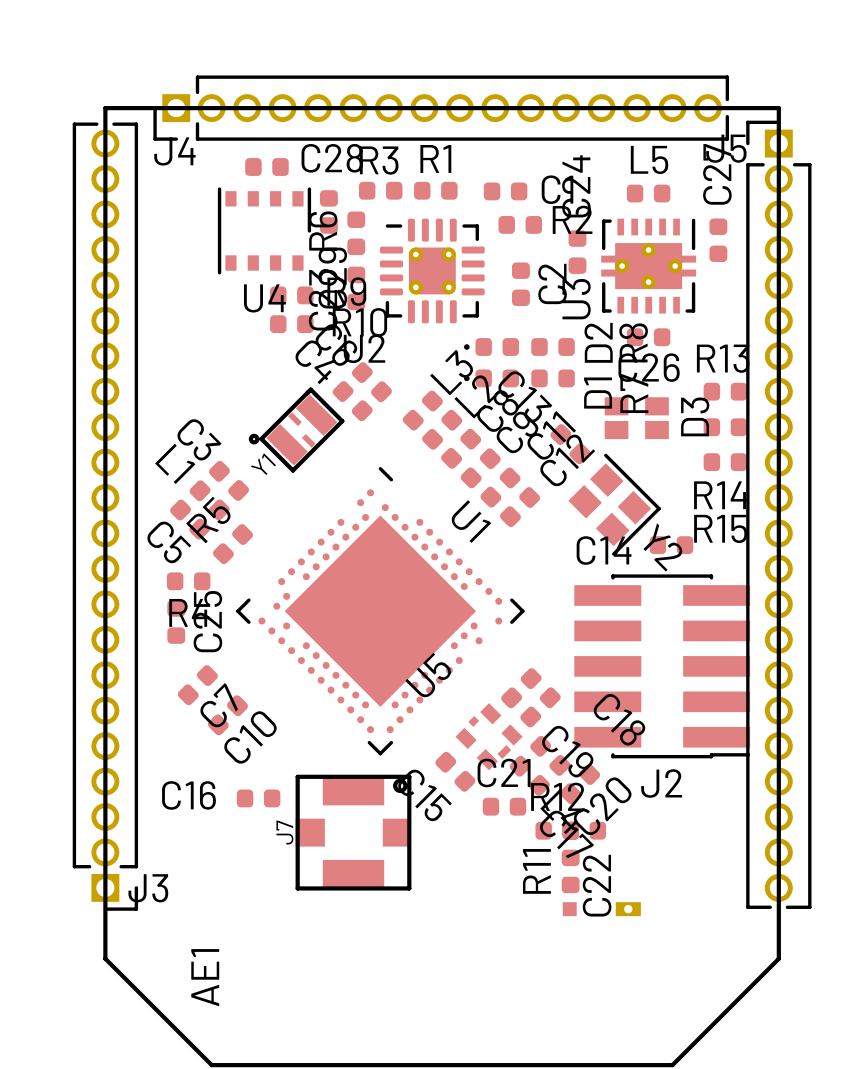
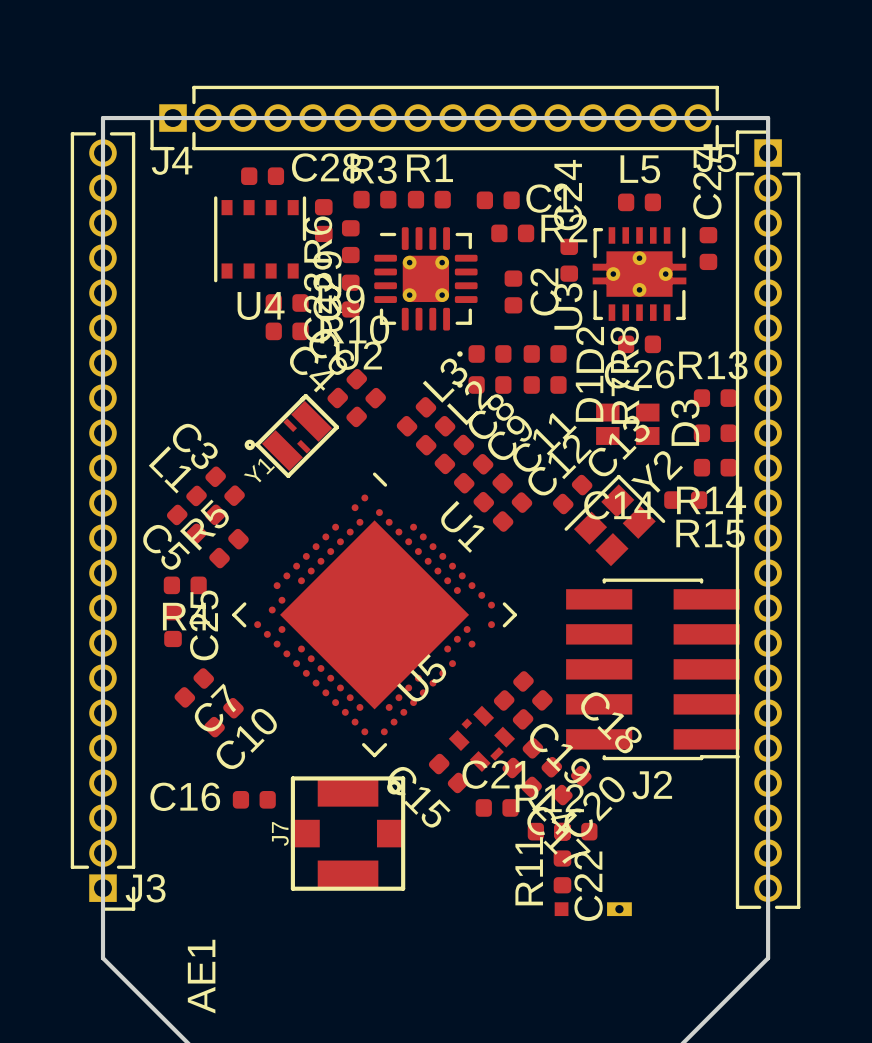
C13 rotation: 0° (570, 444) -> 90° clockwise (572, 494)
C13 position: (570, 444) -> (572, 494)
Y2 rotation: 0° (614, 504) -> 90° counterclockwise (614, 520)
C14 position: (671, 545) -> (685, 500)

